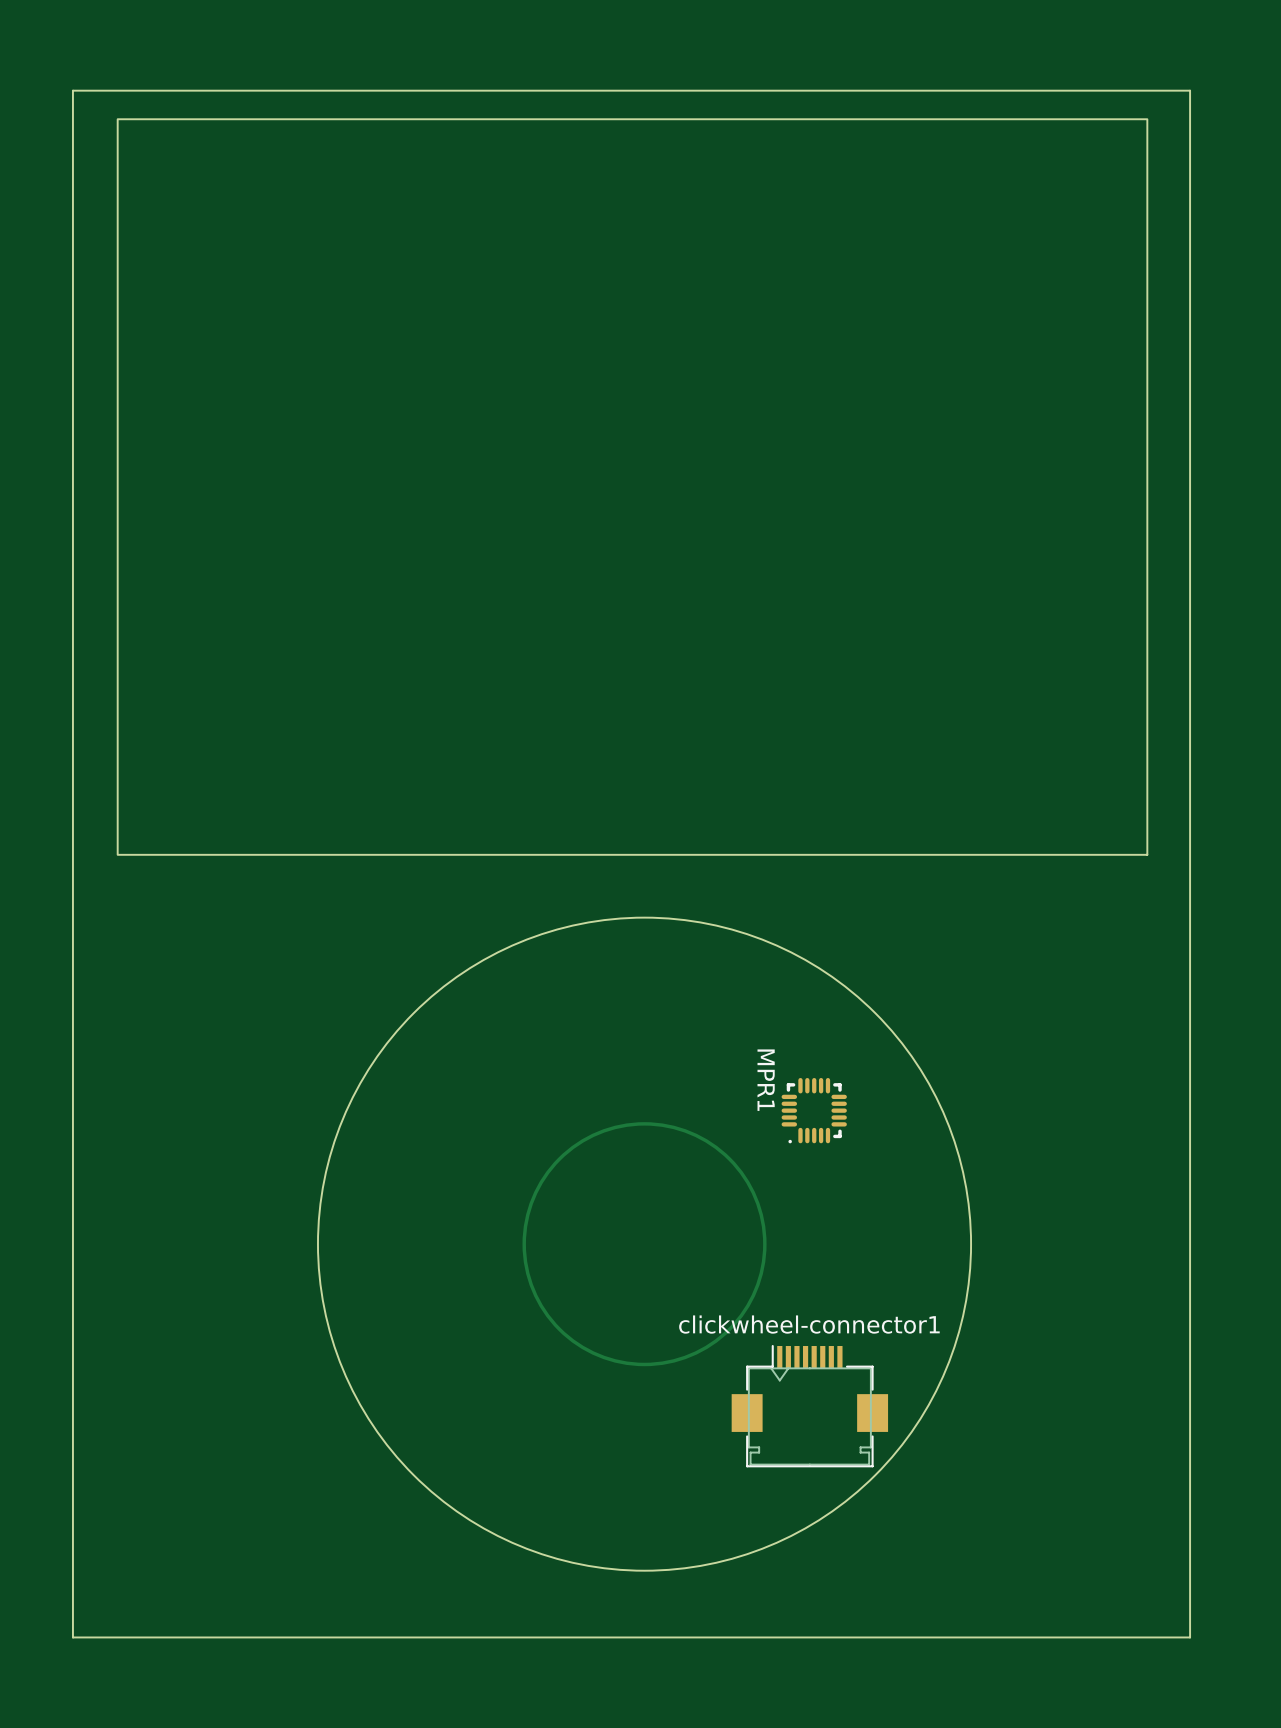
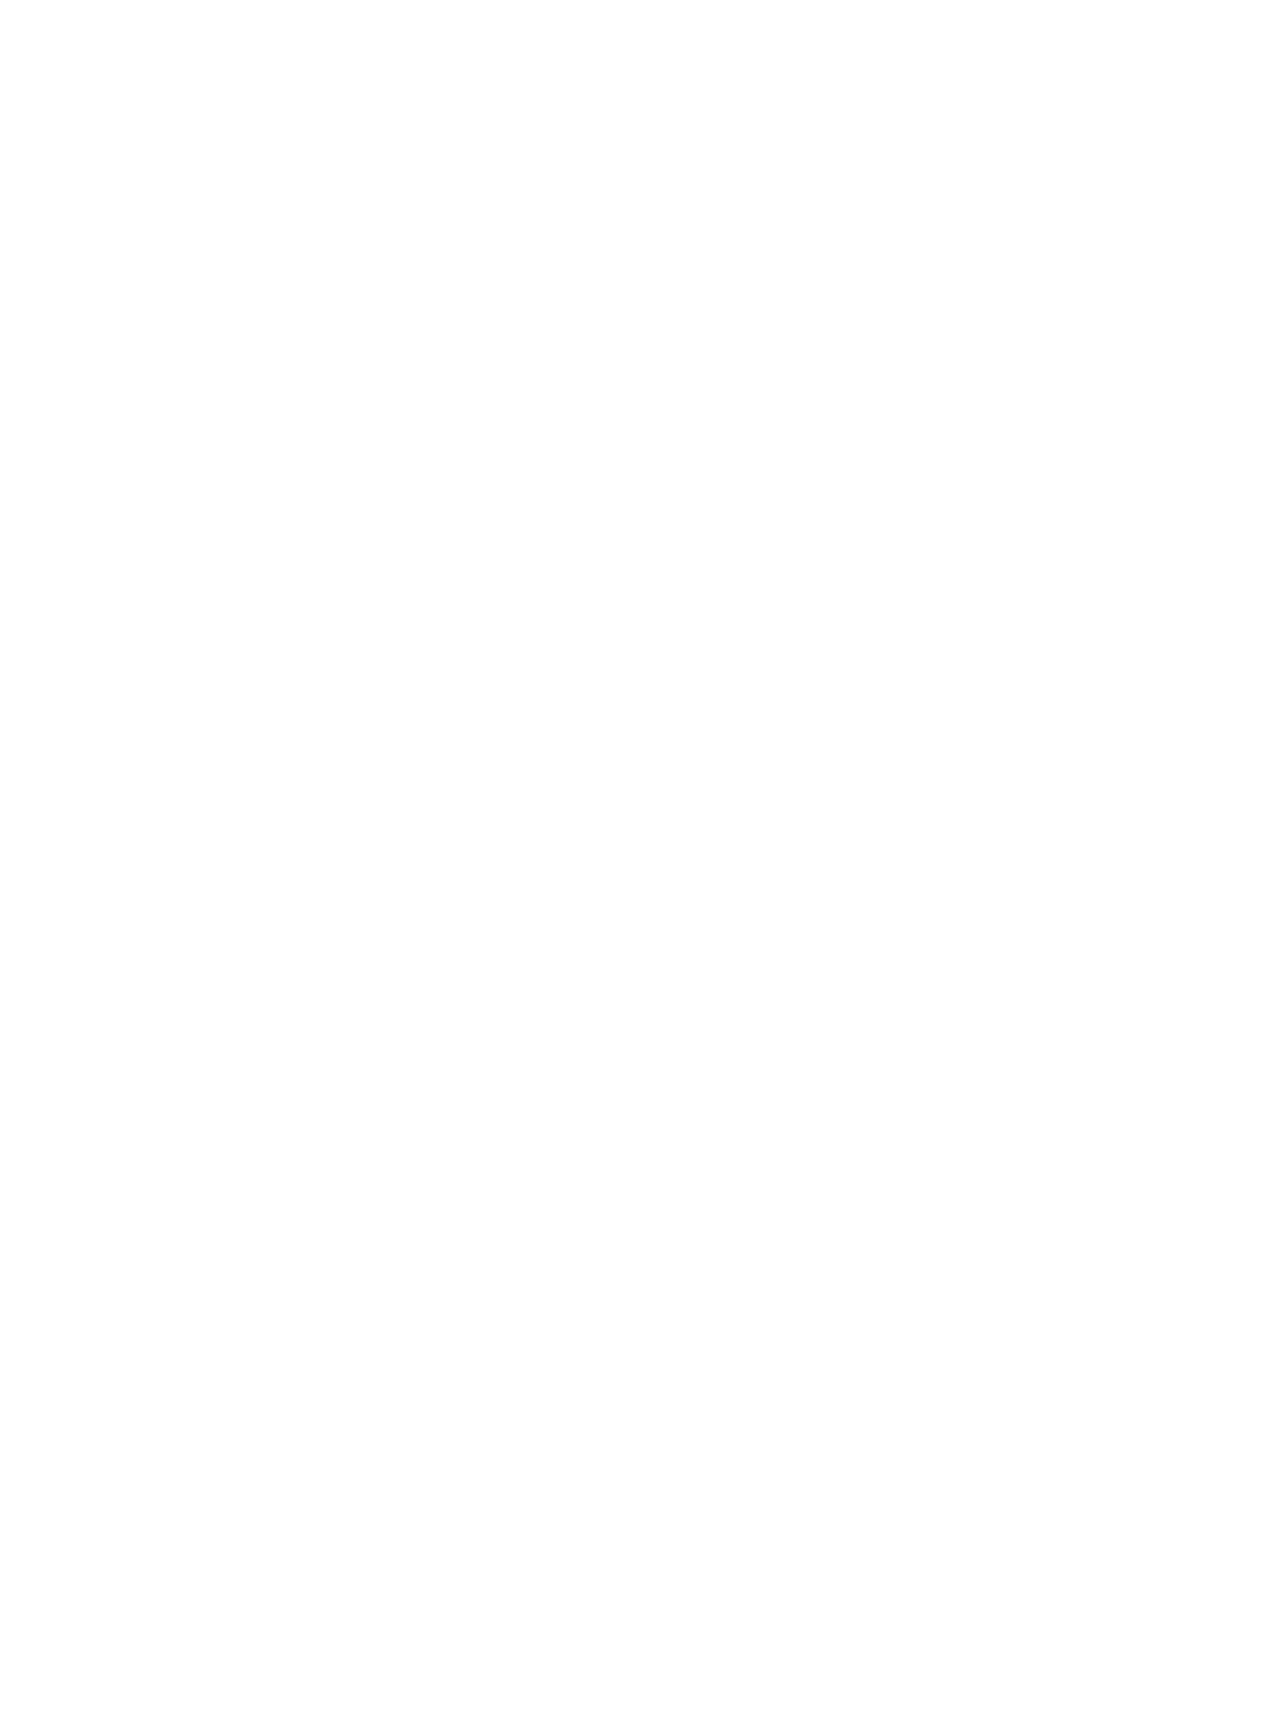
board edge: (1190, 90) (72, 90) (72, 1637) (1190, 1637) (1190, 90) -> none
drawing: [117, 118, 1148, 856] -> none
MPR1: (814, 1110) -> none
part: (644, 1244) -> none
clickwheel-connector1: (809, 1406) -> none

